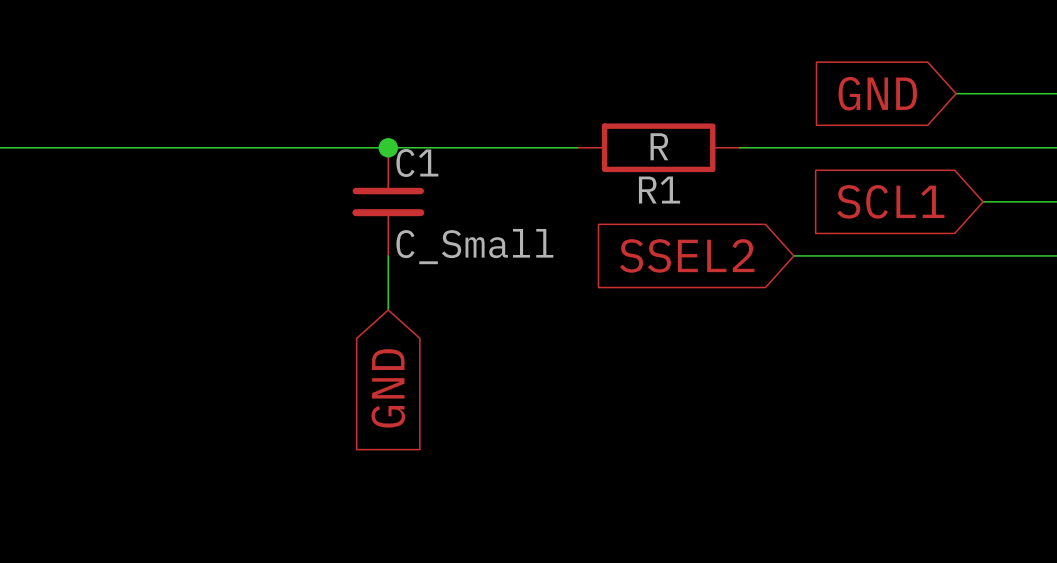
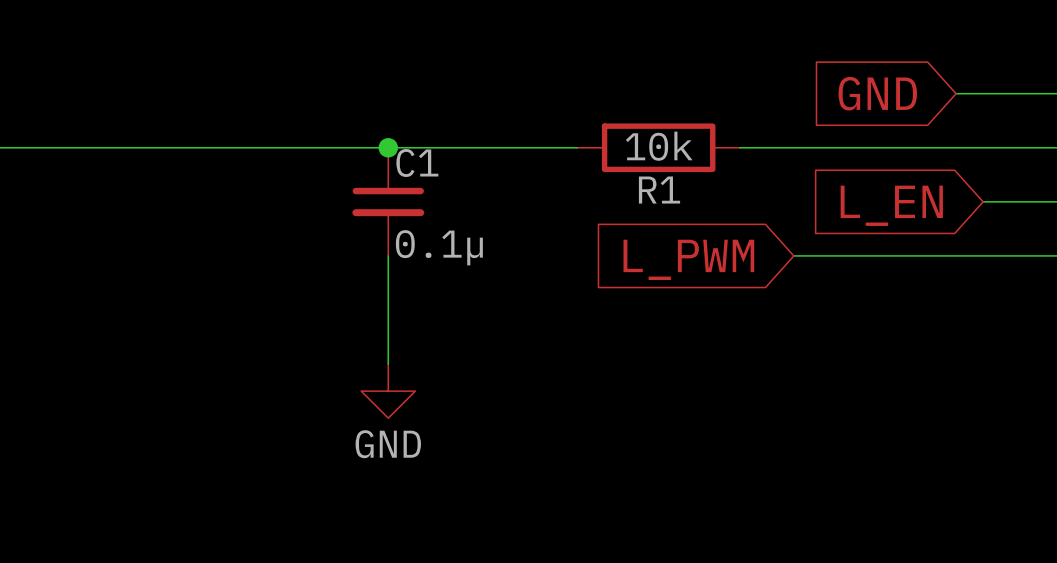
R1 value: R (659, 146) -> 10k (659, 146)
global label: SCL1 (890, 201) -> L_EN (891, 205)
C1 value: C_Small (474, 246) -> 0.1µ (439, 247)
global label: SSEL2 (687, 255) -> L_PWM (688, 259)
wire: none -> (388, 310) (388, 364)
global label: GND (388, 388) -> none
power symbol: none -> GND (388, 391)

